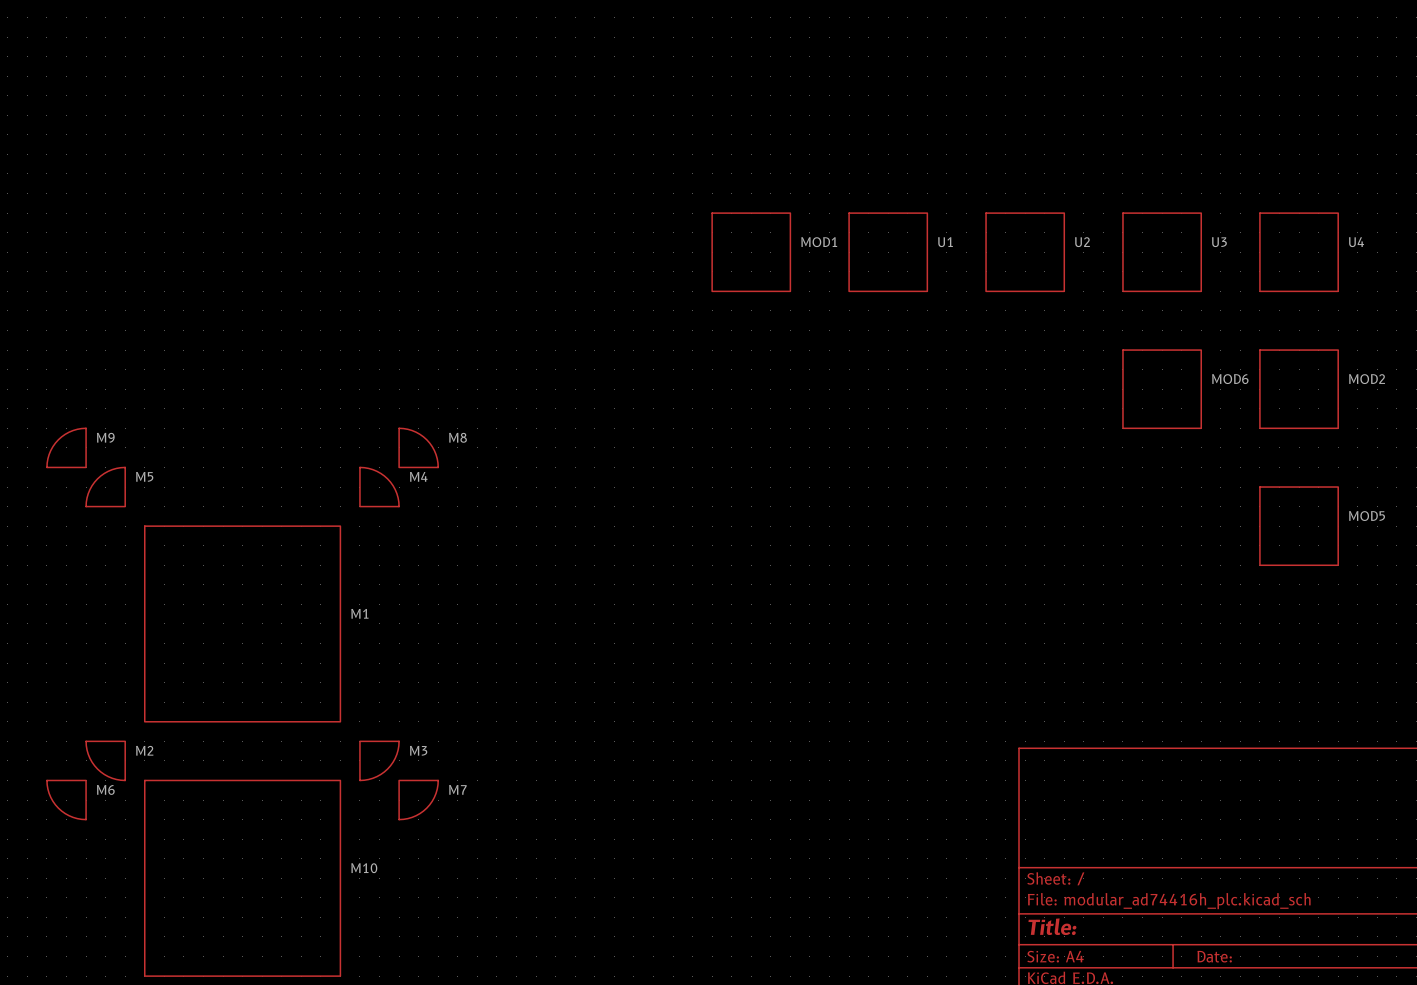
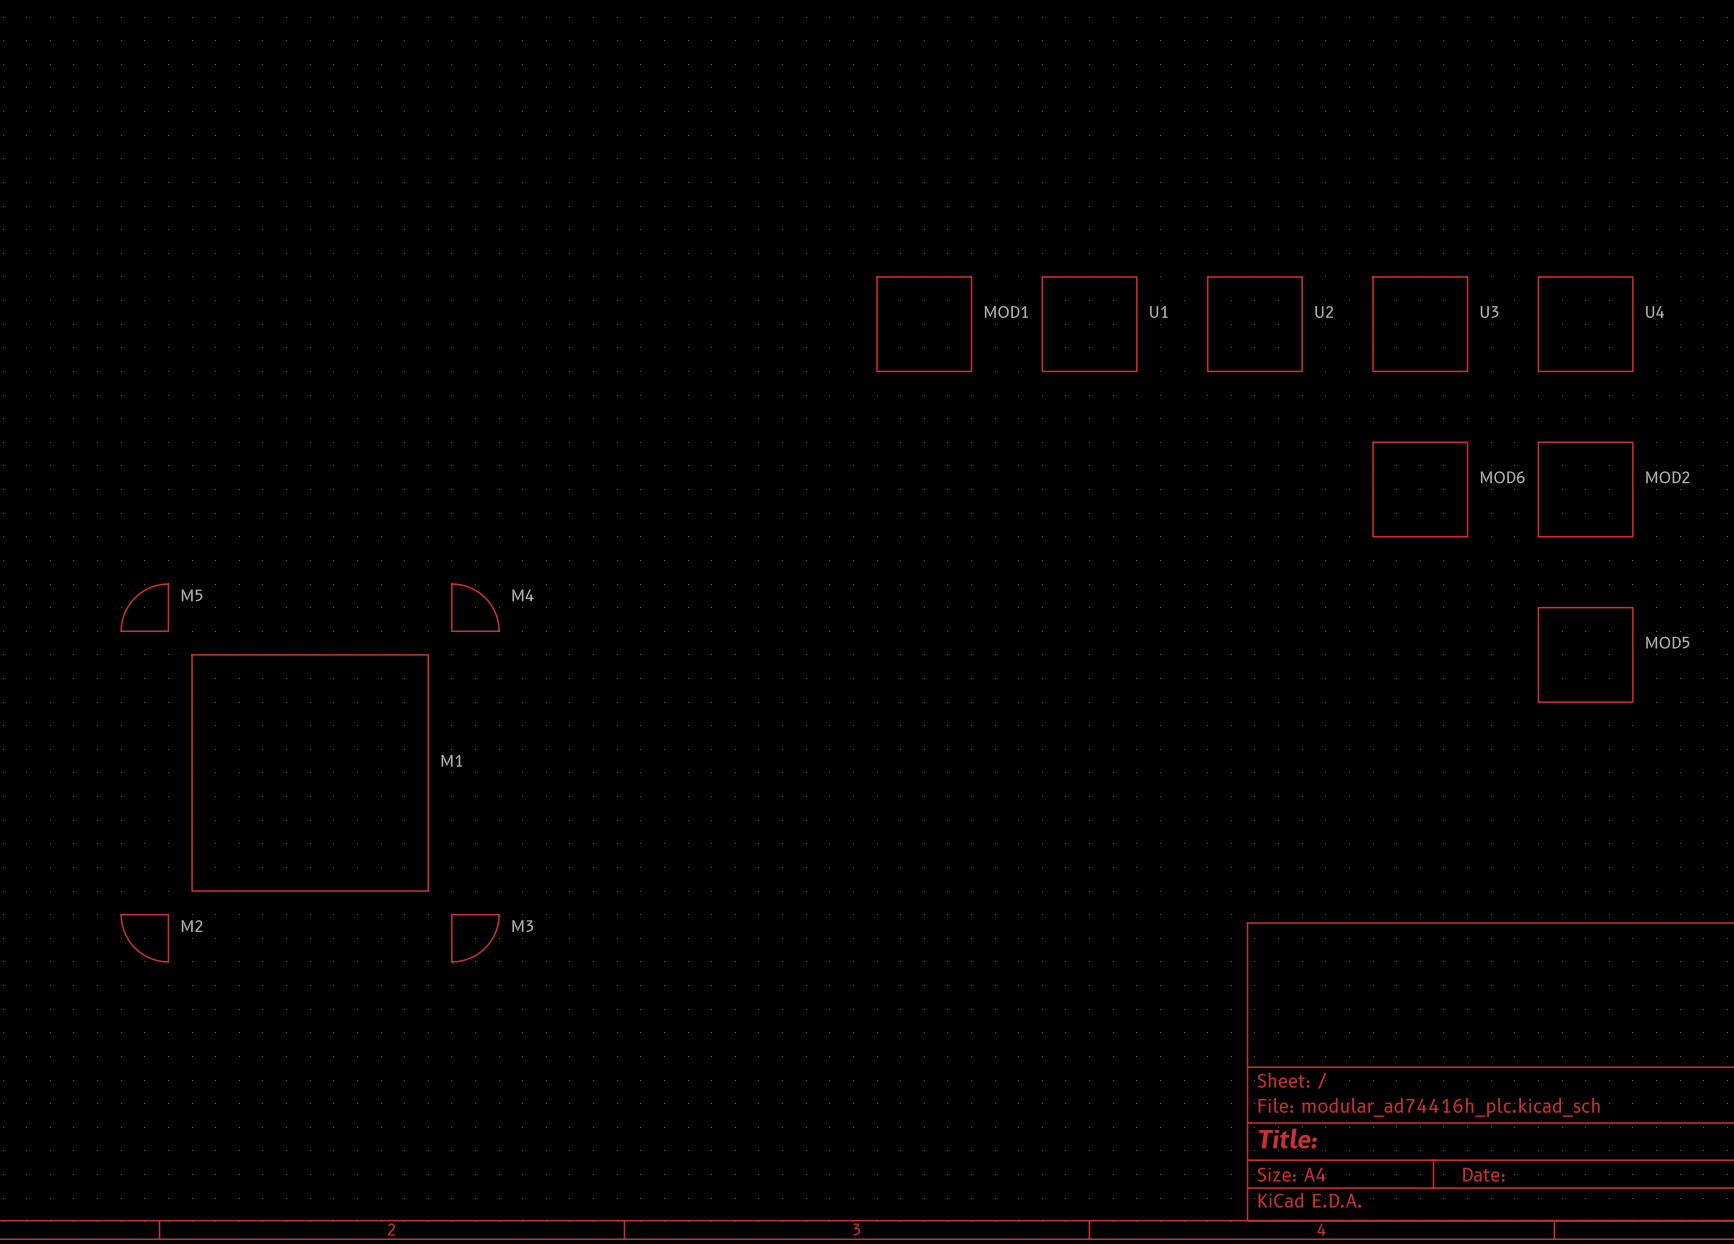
M9: (66, 447) -> none
M8: (418, 447) -> none
M6: (66, 800) -> none
M7: (418, 800) -> none
M10: (242, 878) -> none

